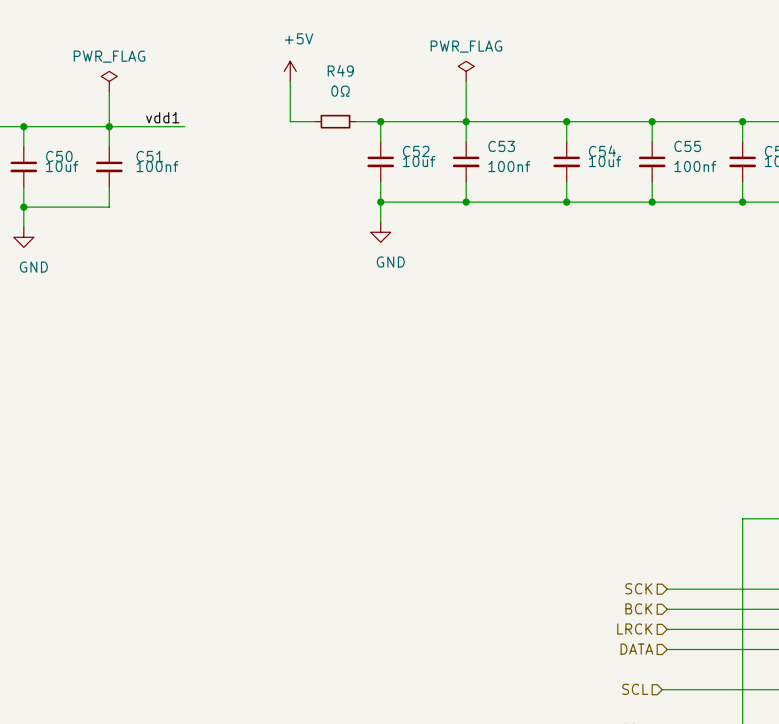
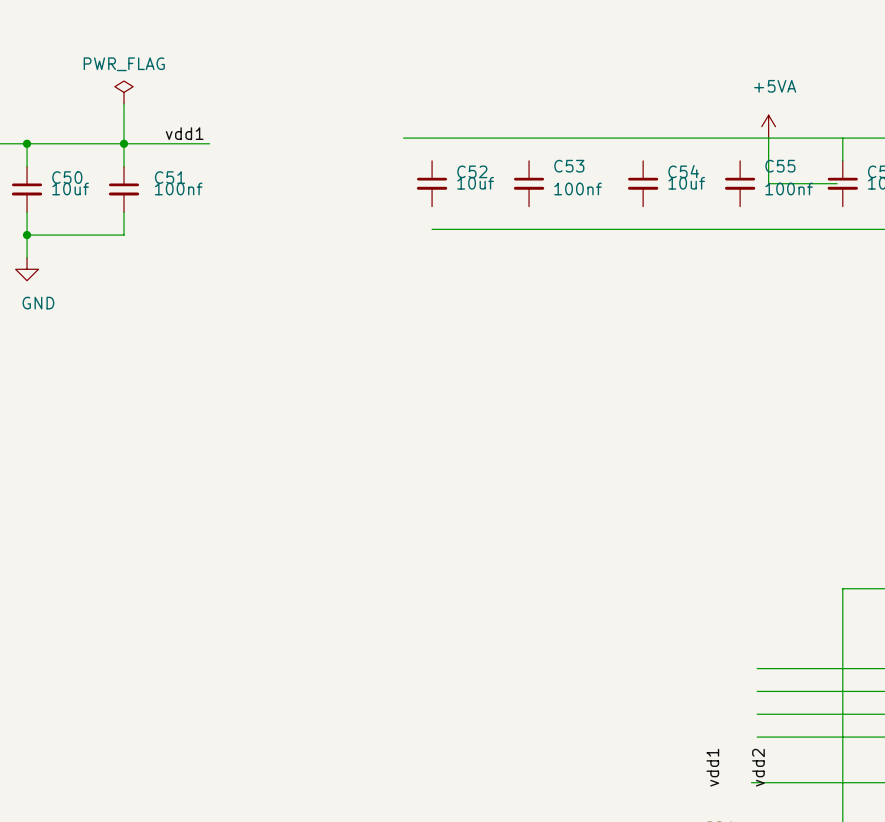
power symbol: +5V (290, 71) -> none
power symbol: PWR_FLAG (466, 71) -> none
wire: (290, 81) (290, 121) (315, 121) -> none
wire: (466, 81) (466, 141) -> none
power symbol: none -> +5VA (768, 126)
R49: 0Ω (335, 121) -> none
wire: (380, 121) (380, 141) -> none
junction: (380, 121) -> none
junction: (466, 121) -> none
wire: (566, 121) (566, 141) -> none
junction: (566, 121) -> none
wire: (652, 121) (652, 141) -> none
junction: (652, 121) -> none
wire: none -> (768, 138) (768, 183) (837, 183)
junction: (742, 121) -> none
wire: (380, 181) (380, 222) -> none
wire: (466, 181) (466, 202) -> none
wire: (566, 181) (566, 202) -> none
wire: (652, 181) (652, 202) -> none
wire: (742, 181) (742, 202) -> none
junction: (380, 202) -> none
junction: (466, 202) -> none
junction: (566, 202) -> none
junction: (652, 202) -> none
junction: (742, 202) -> none
power symbol: GND (380, 232) -> none
hierarchical label: SCK (638, 588) -> none
hierarchical label: BCK (638, 608) -> none
hierarchical label: LRCK (634, 629) -> none
hierarchical label: DATA (636, 649) -> none
label: none -> vdd1 (712, 767)
label: none -> vdd2 (758, 767)
hierarchical label: SCL (635, 689) -> none

